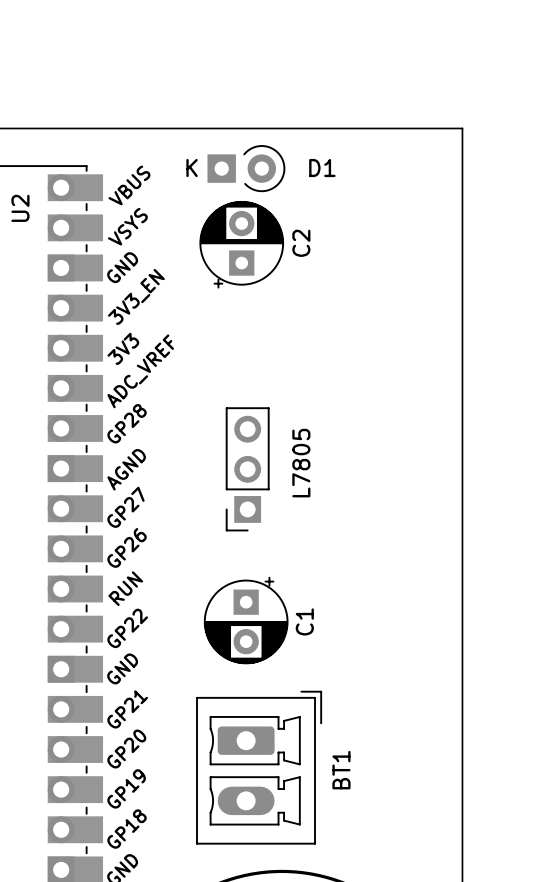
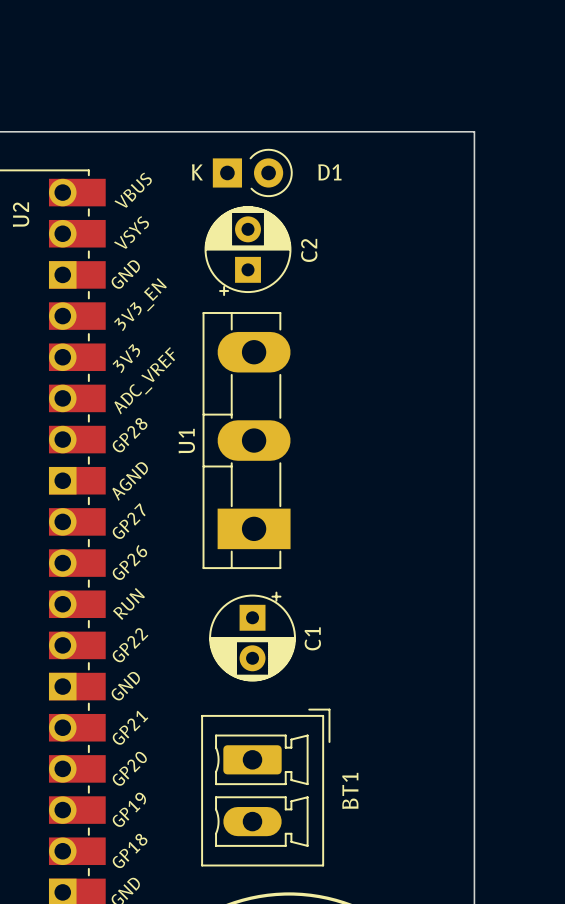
U1: none -> (246, 440)
part: L7805 (247, 469) -> none

